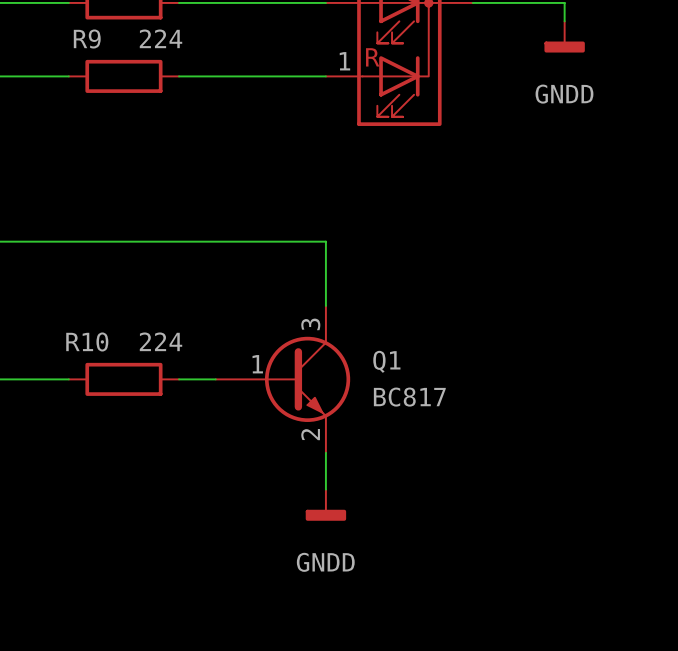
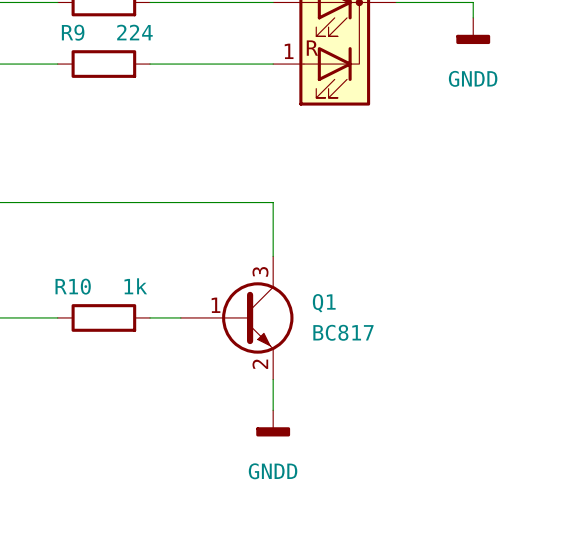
R10 value: 224 (161, 341) -> 1k (135, 286)

